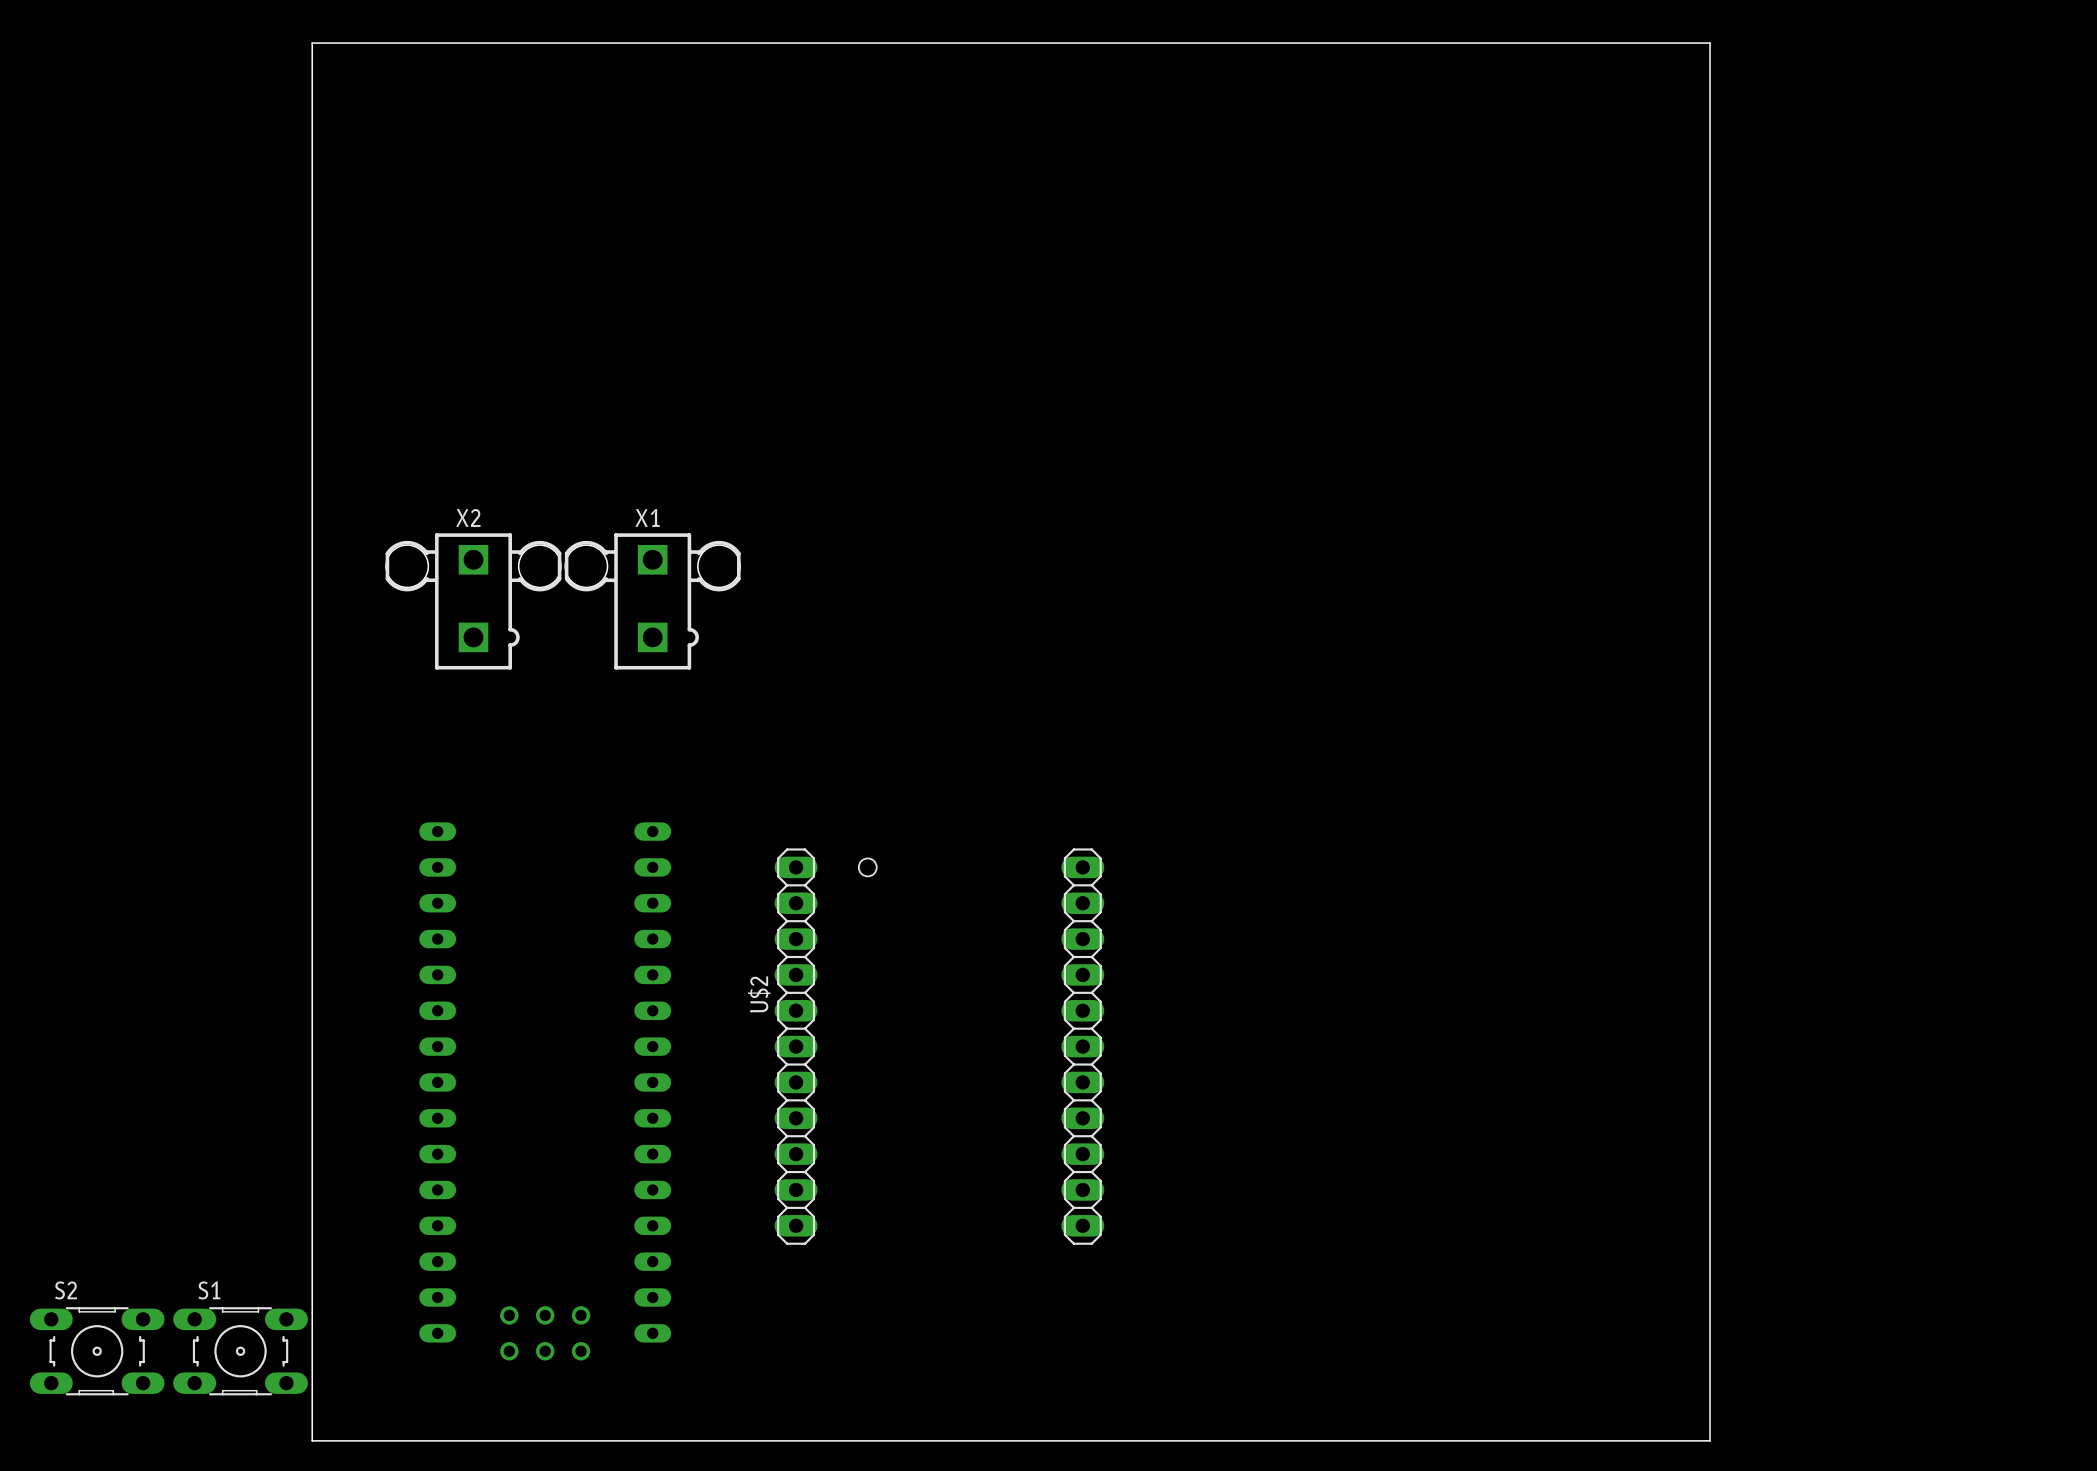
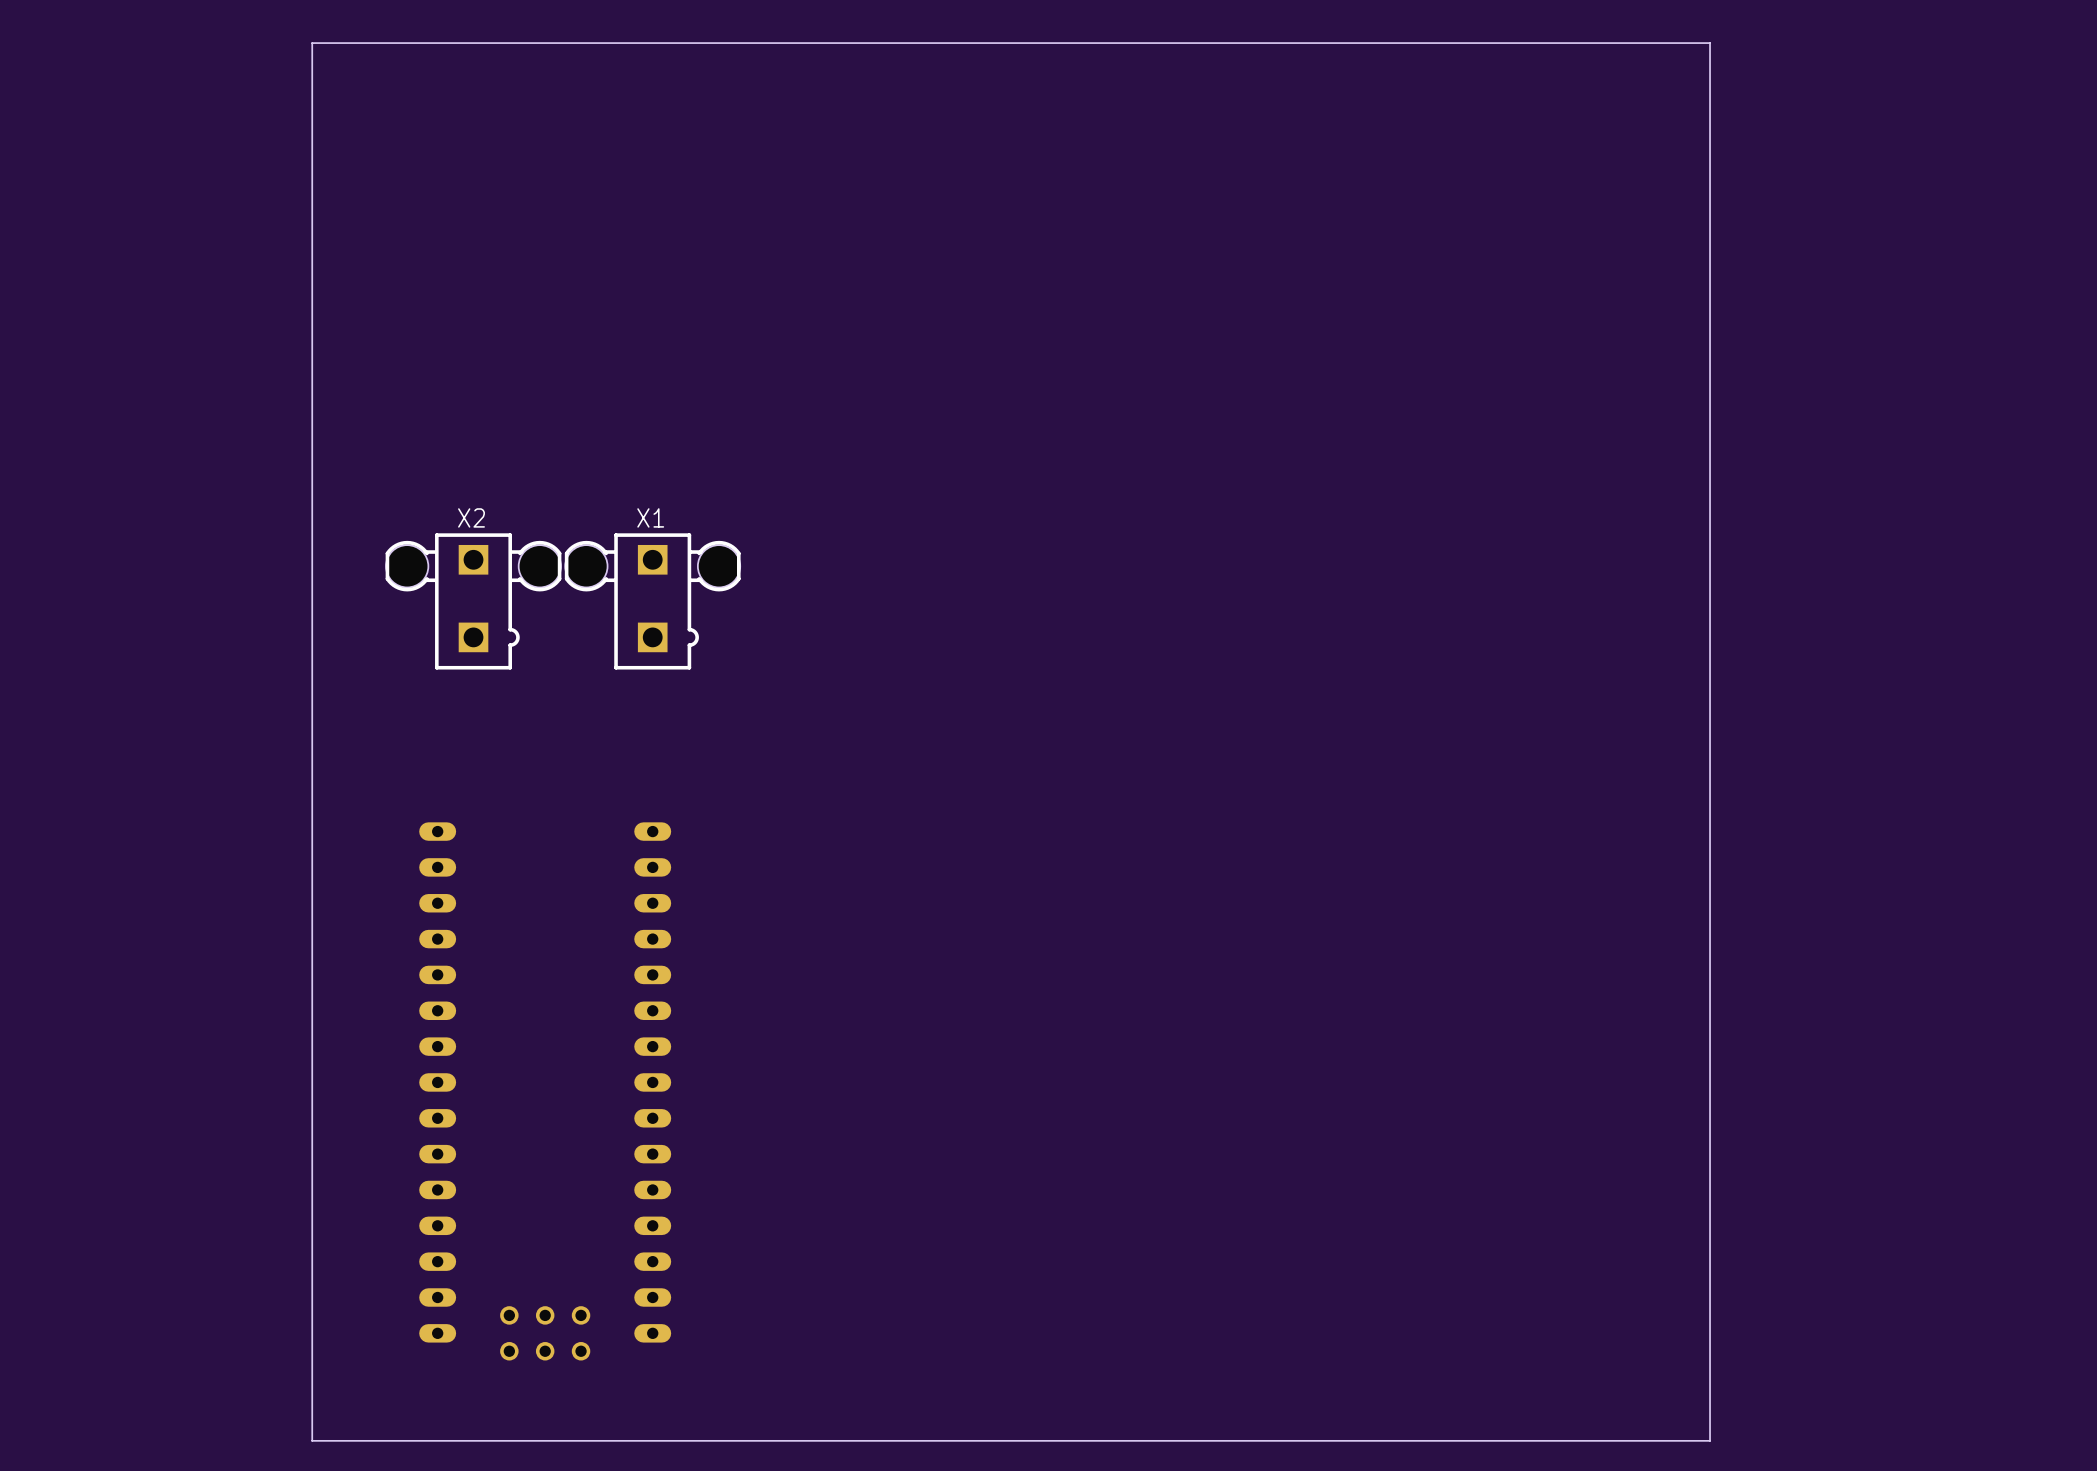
U$2: (939, 1046) -> none
S2: (97, 1351) -> none
S1: (240, 1351) -> none

